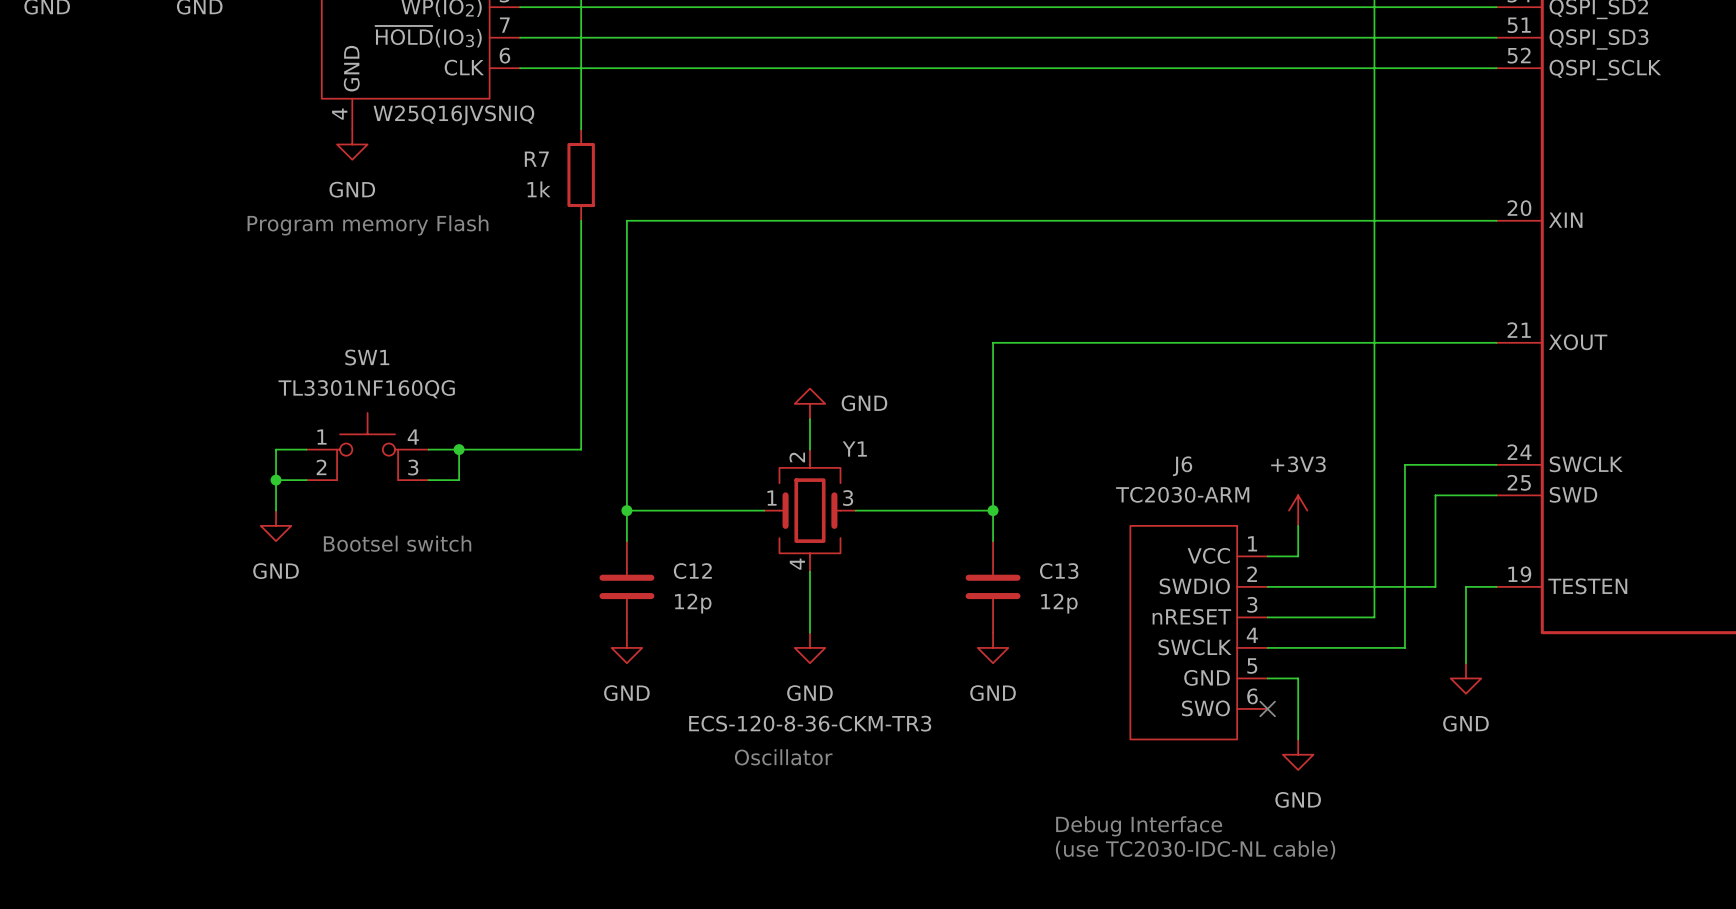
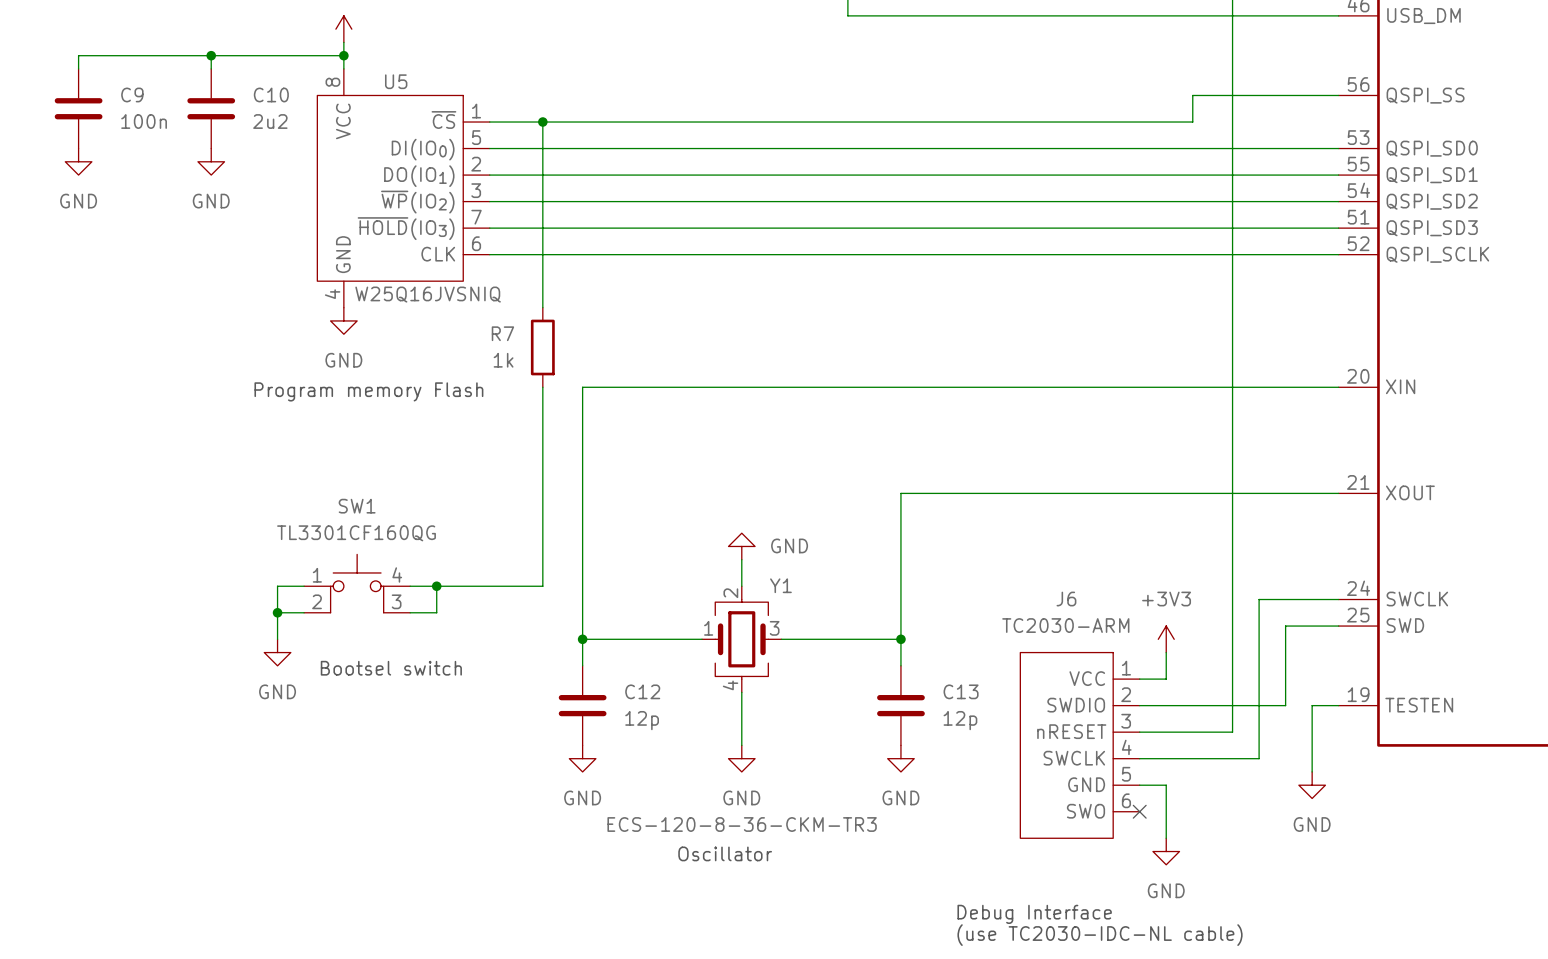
SW1 value: TL3301NF160QG (366, 389) -> TL3301CF160QG (356, 533)

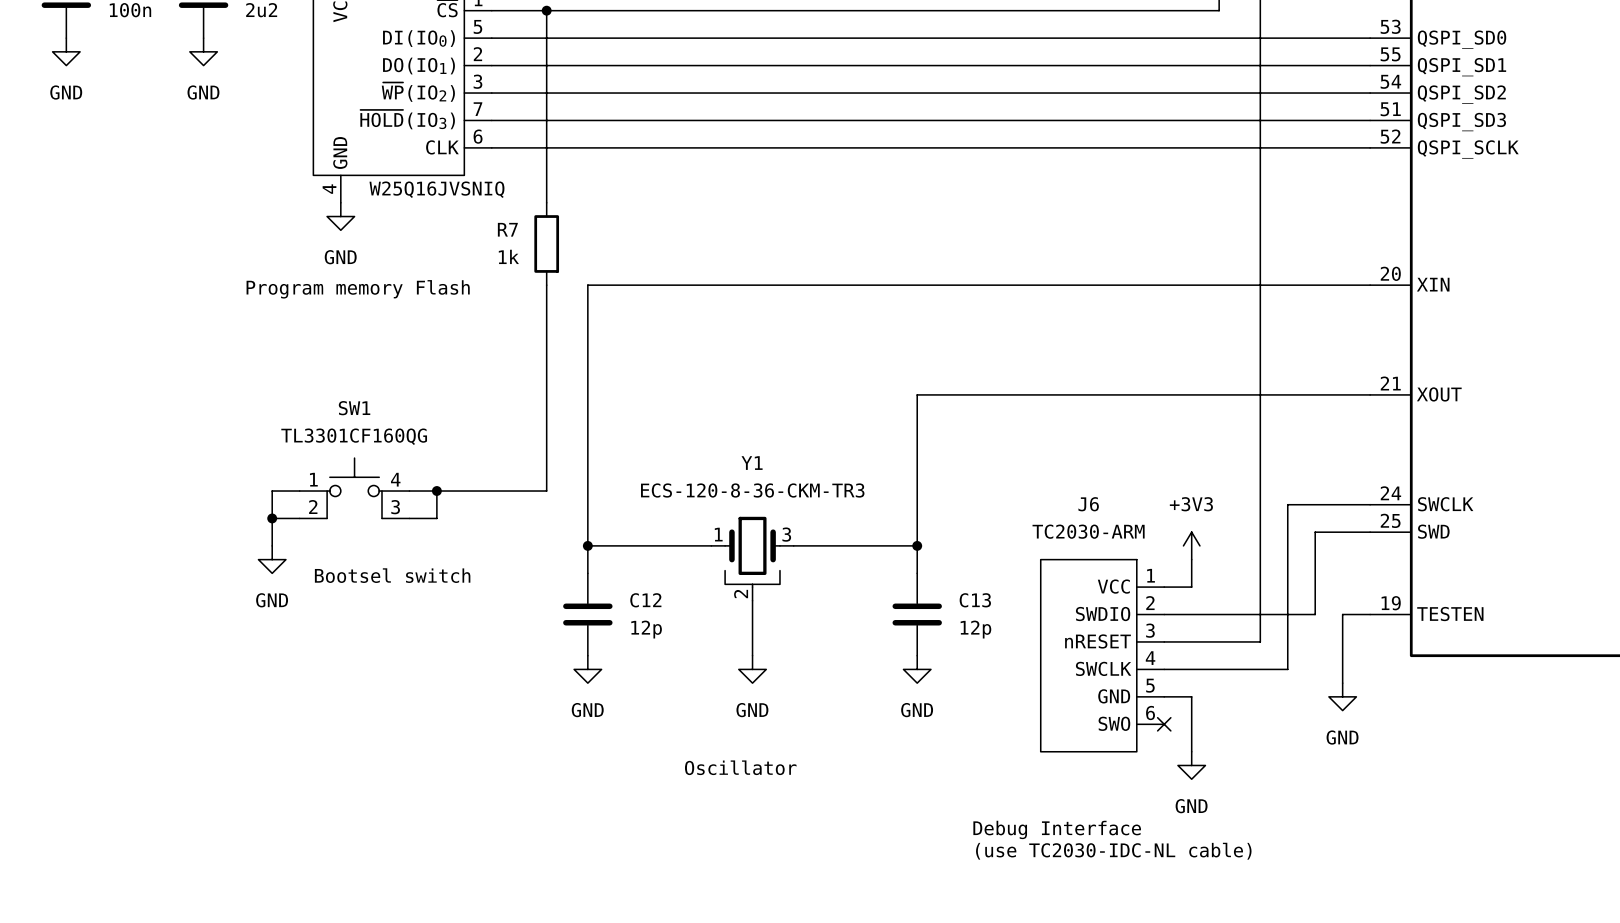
power symbol: GND (741, 546) -> none
wire: (741, 559) (741, 586) -> none
Y1 name position: Y1 (780, 585) -> Y1 (752, 463)
Y1 symbol: [702, 586, 782, 693] -> [711, 516, 794, 601]
Y1 value position: ECS-120-8-36-CKM-TR3 (742, 824) -> ECS-120-8-36-CKM-TR3 (752, 490)

